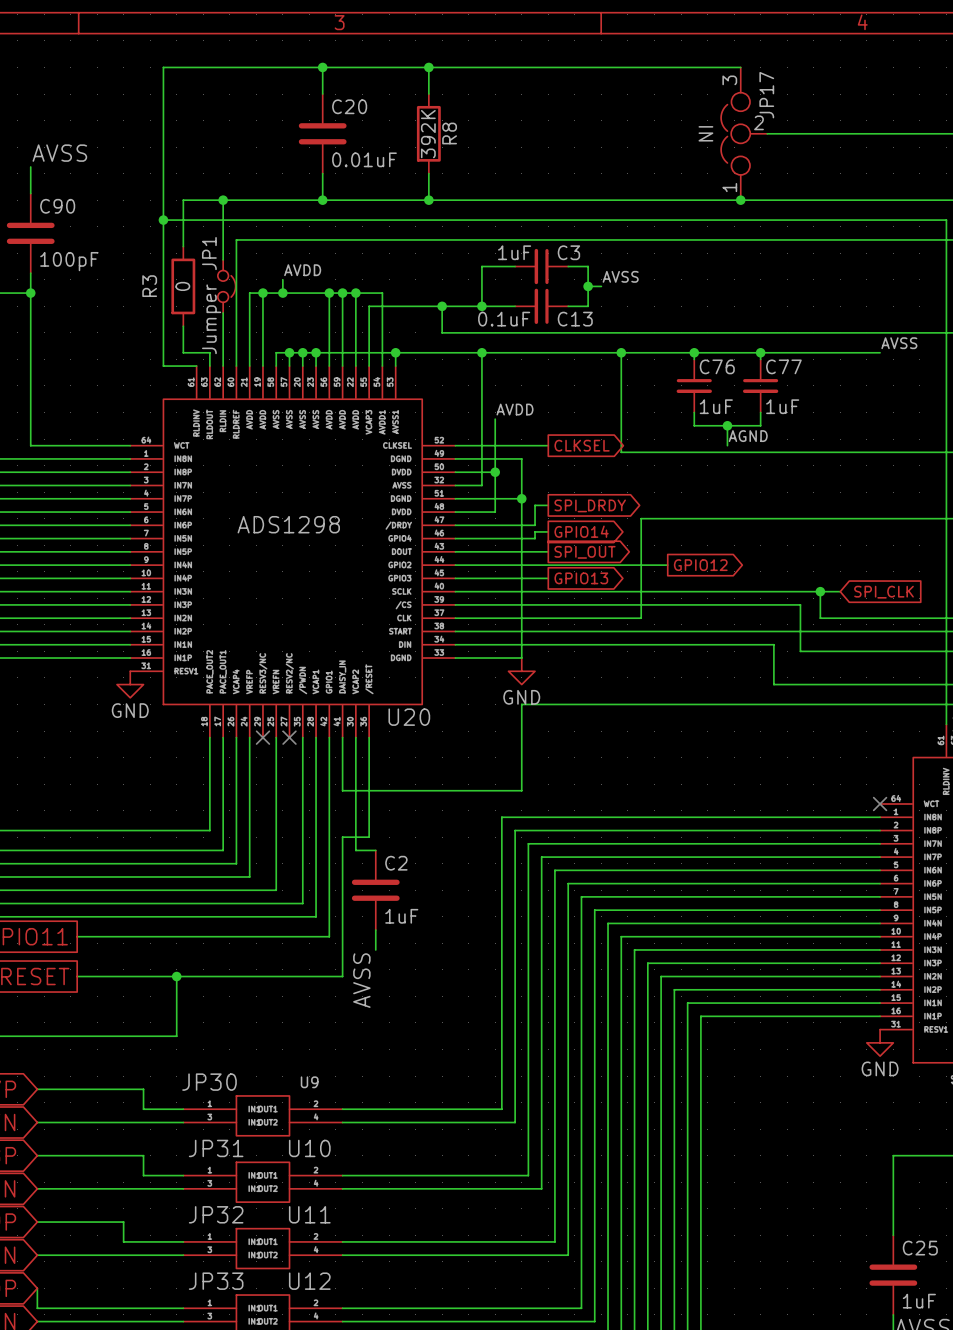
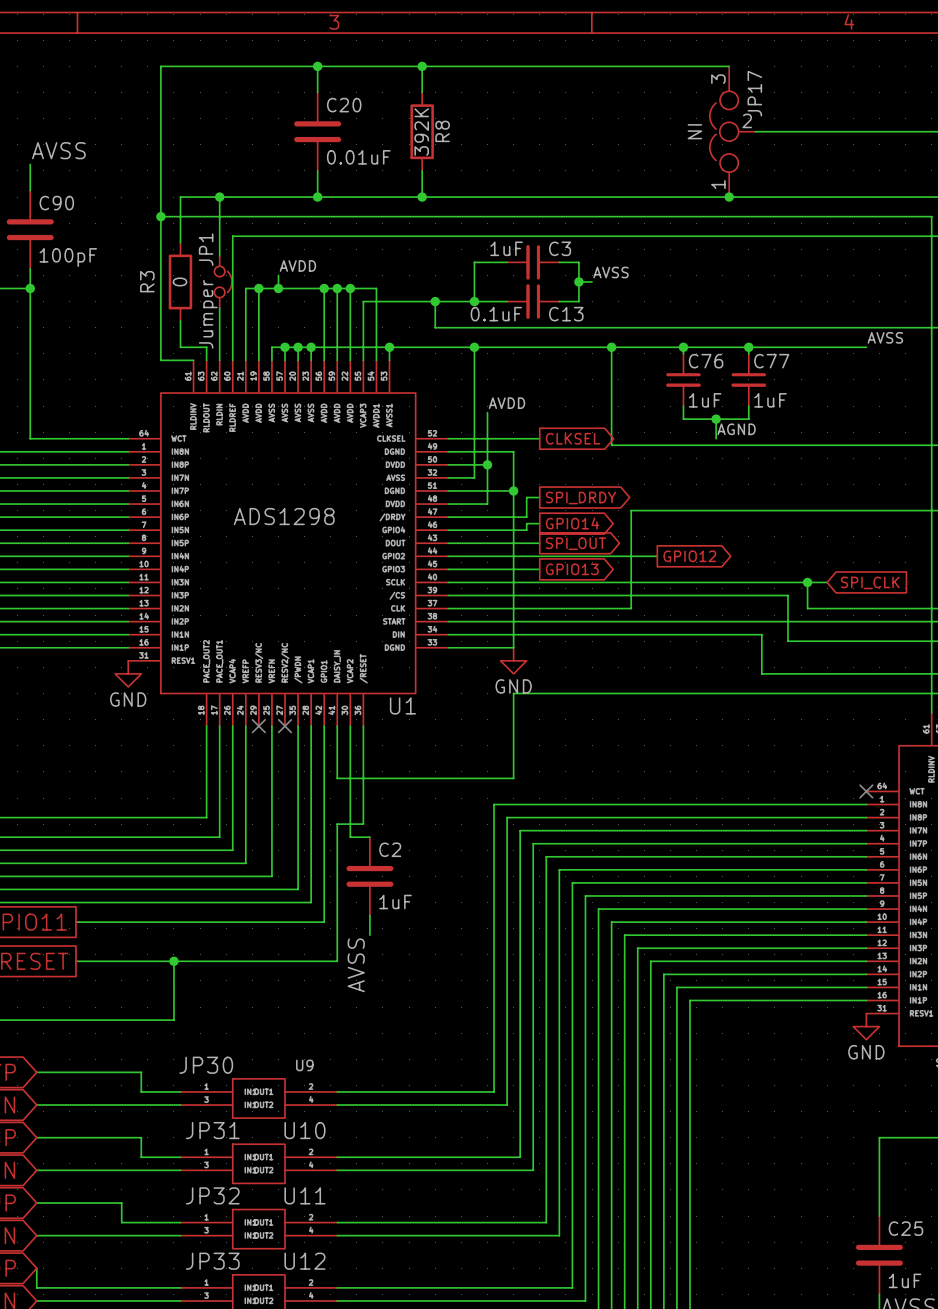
U20 name: U20 (409, 717) -> U1 (402, 705)

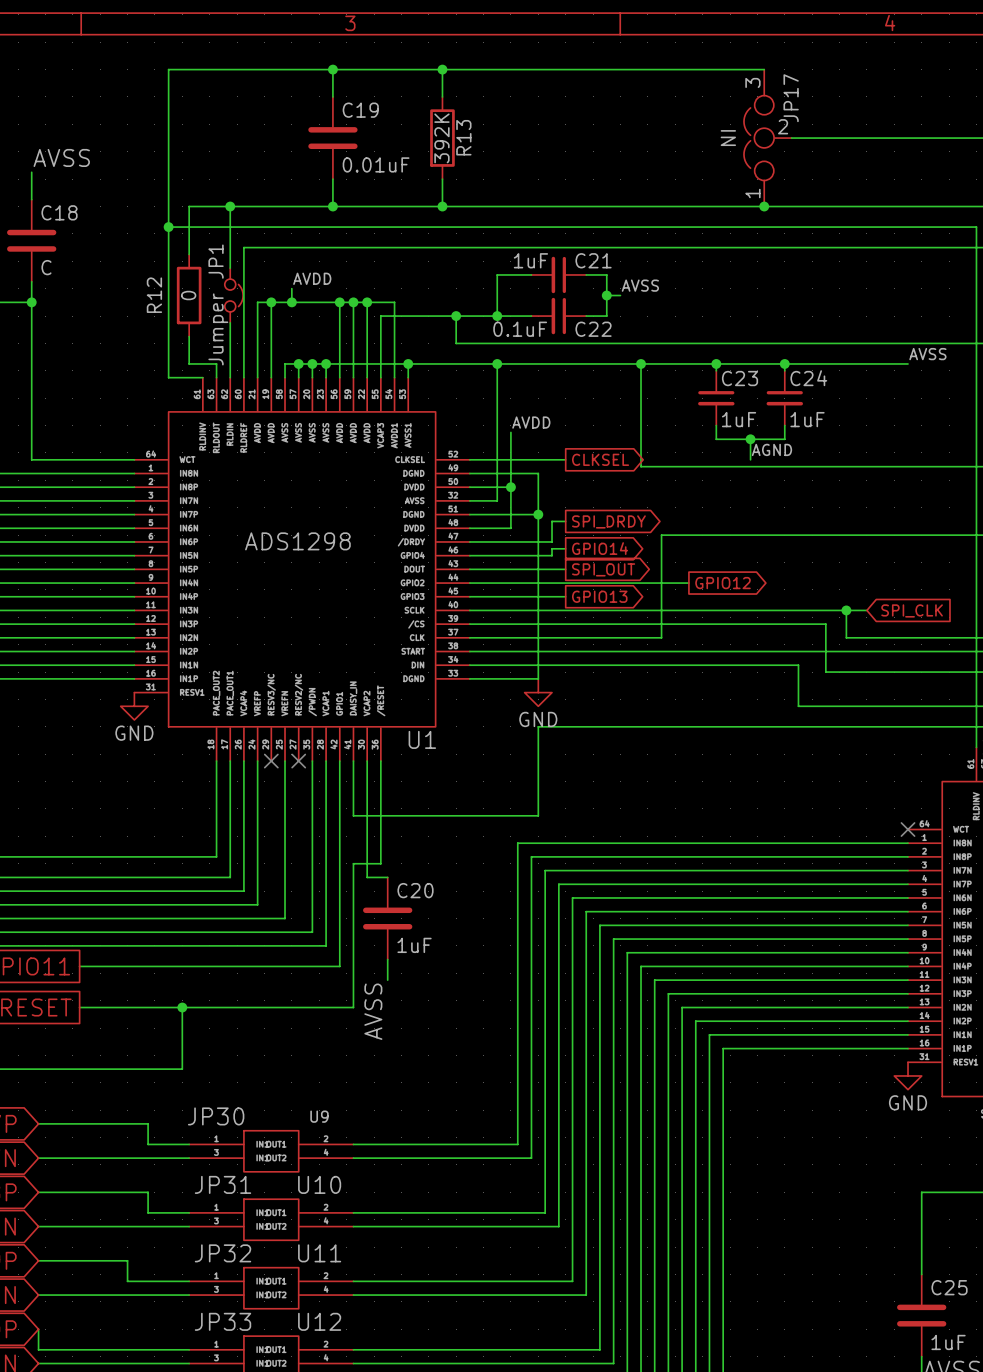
C20 name: C20 (344, 105) -> C19 (360, 110)
R8 name: R8 (442, 131) -> R13 (463, 137)
C90 name: C90 (56, 203) -> C18 (59, 212)
C3 name: C3 (560, 248) -> C21 (593, 260)
C90 value: 100pF (68, 257) -> C (46, 267)
R3 name: R3 (147, 281) -> R12 (154, 295)
C13 name: C13 (566, 314) -> C22 (593, 329)
C76 name: C76 (706, 361) -> C23 (740, 378)
C77 name: C77 (771, 361) -> C24 (808, 378)
C2 name: C2 (390, 849) -> C20 (415, 890)

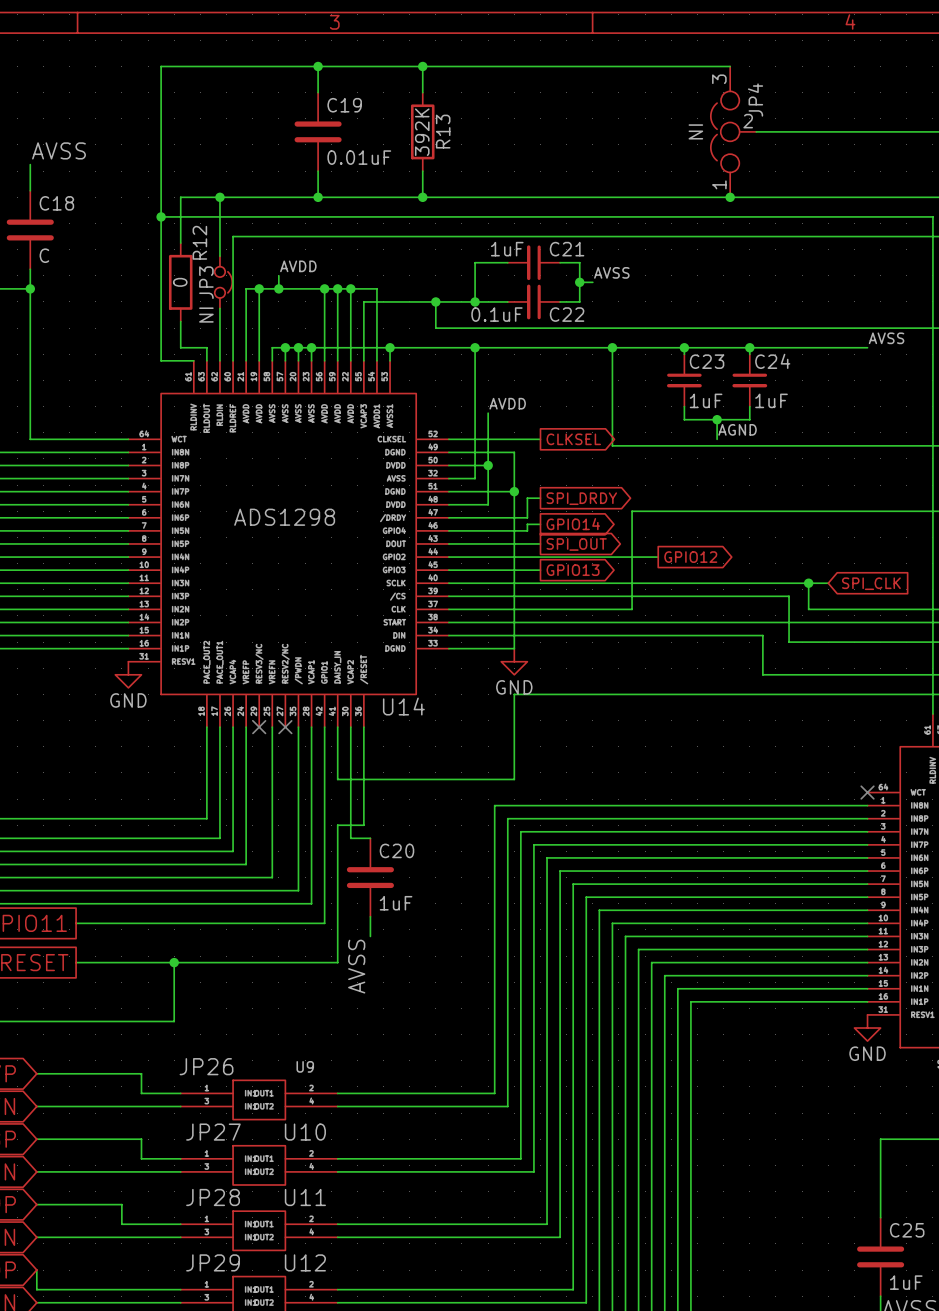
JP17 name: JP17 (791, 98) -> JP4 (755, 100)
JP1 name: JP1 (216, 261) -> JP3 (206, 282)
R12 name position: R12 (154, 295) -> R12 (199, 242)
JP1 value: Jumper (218, 329) -> NI (206, 315)
U1 name: U1 (422, 739) -> U14 (403, 706)
U9 value: JP30 (216, 1116) -> JP26 (206, 1066)
U10 value: JP31 (223, 1184) -> JP27 (213, 1132)
U11 value: JP32 (223, 1253) -> JP28 (213, 1197)
U12 value: JP33 (223, 1321) -> JP29 (213, 1262)

